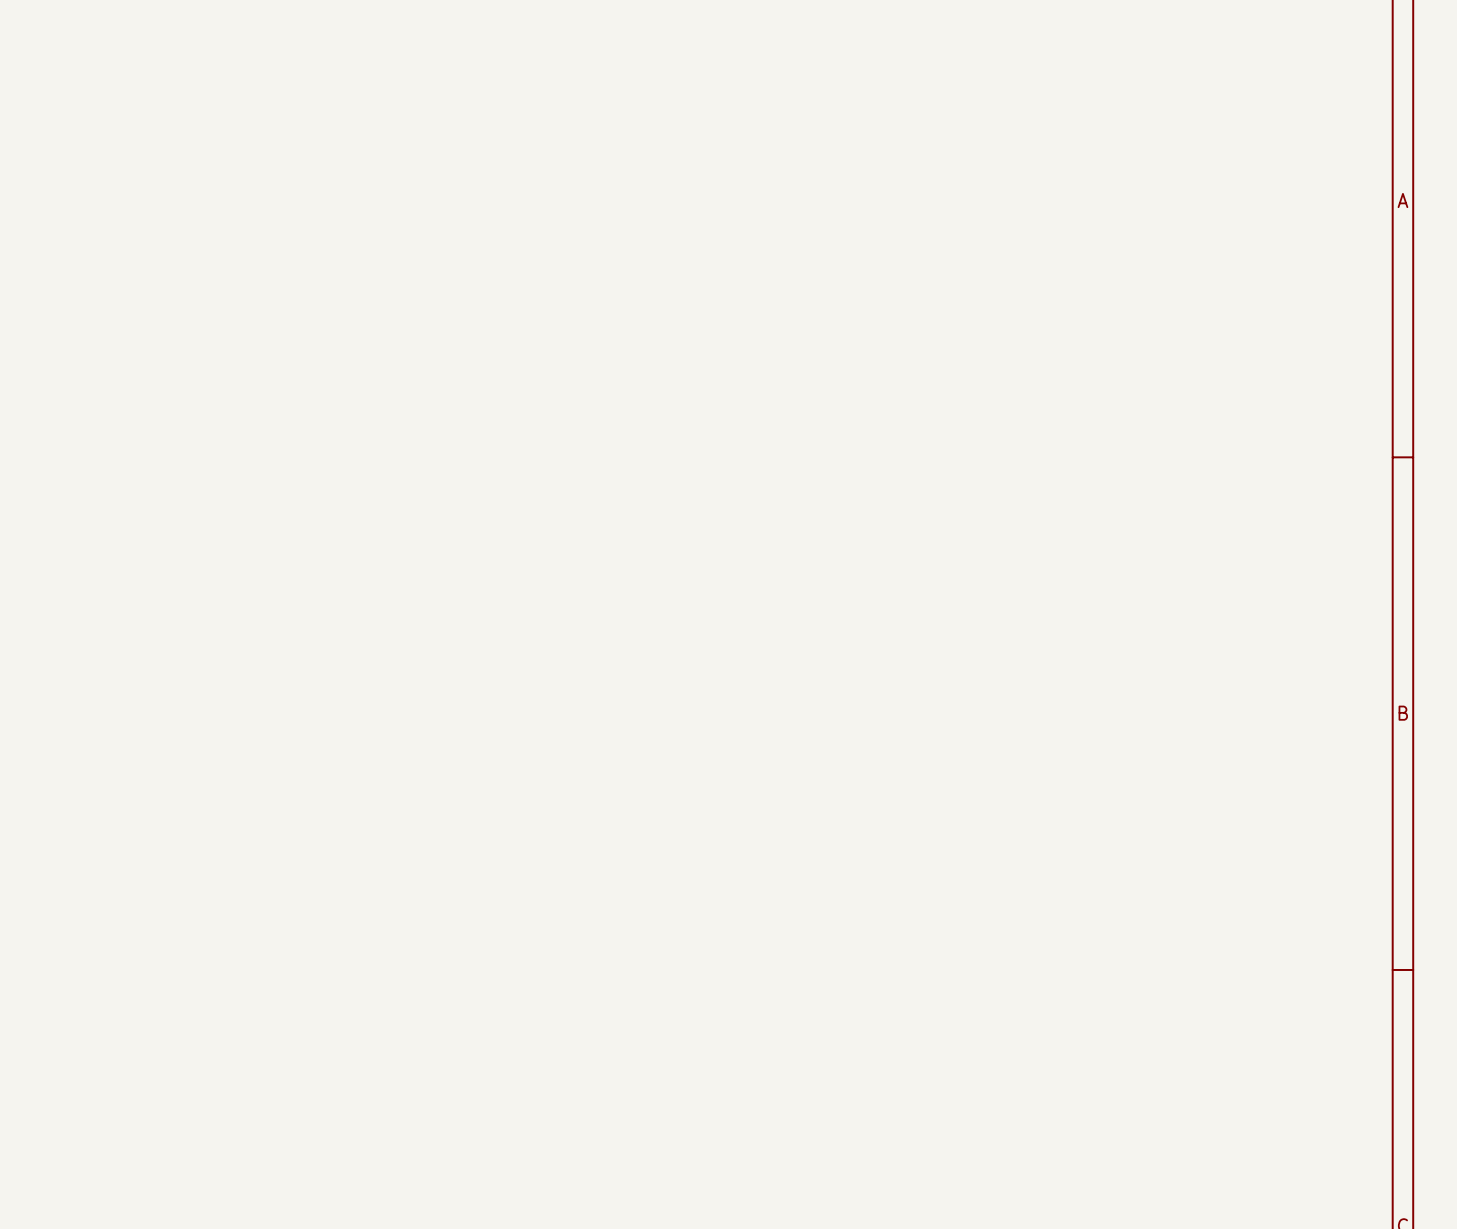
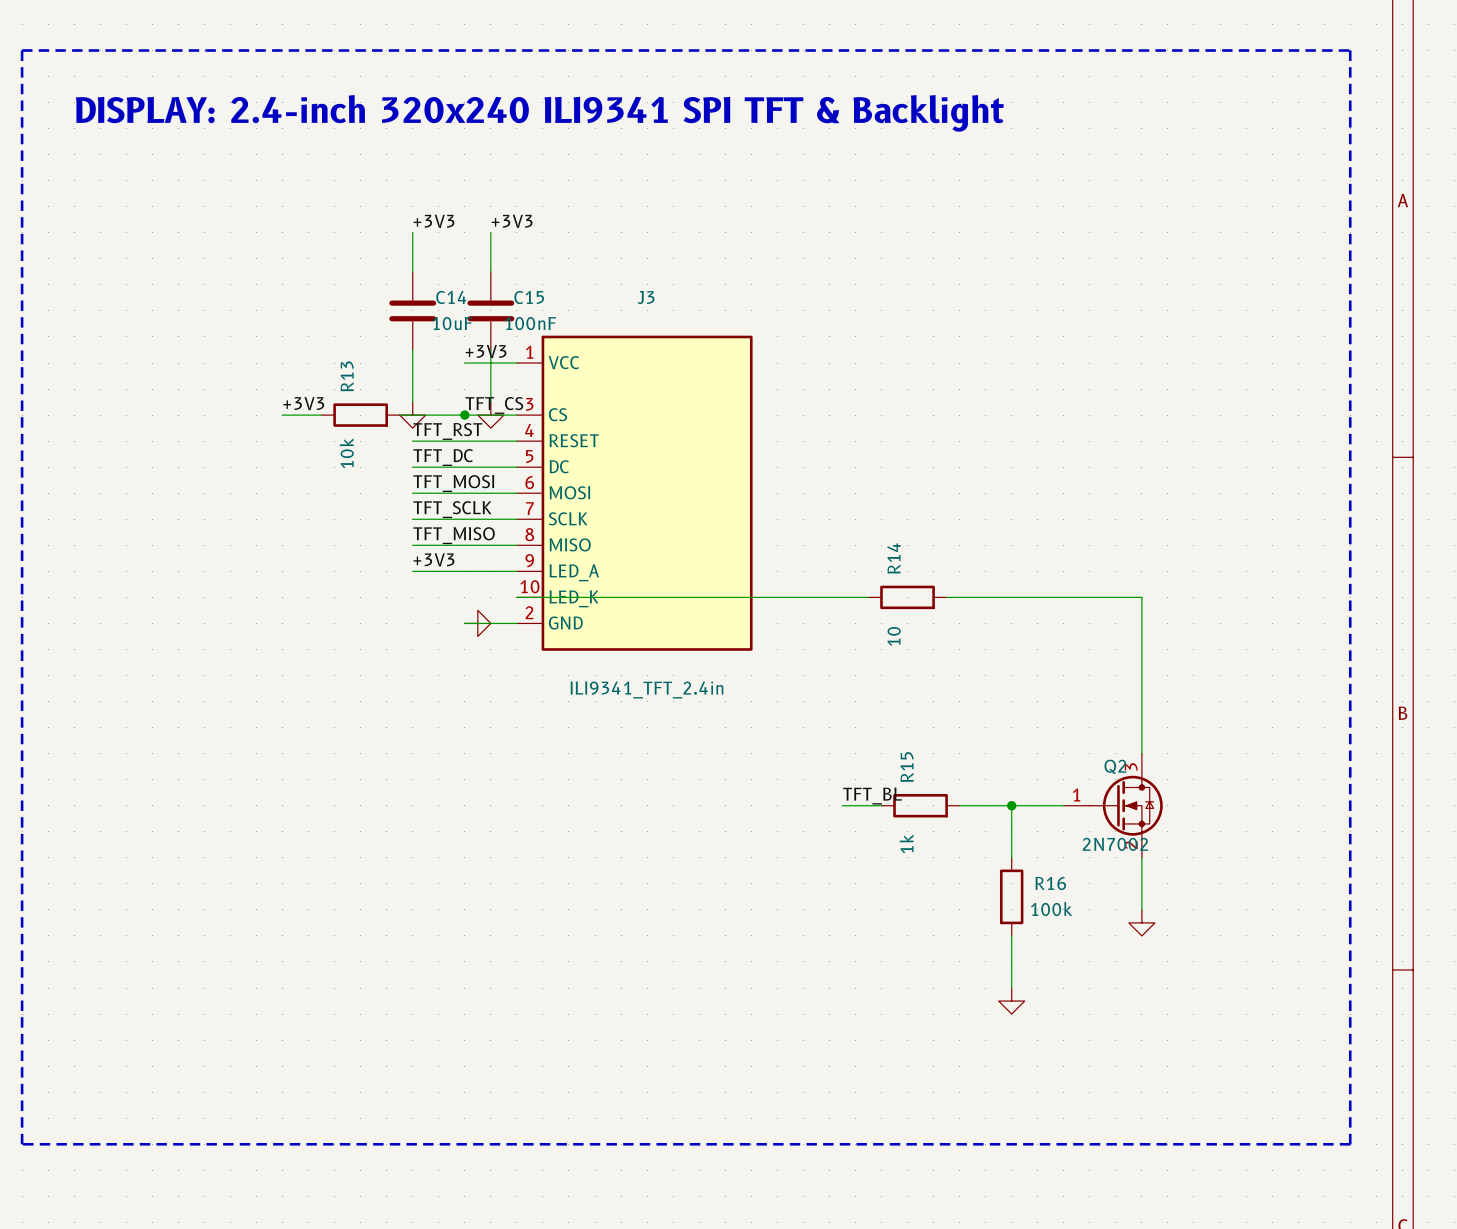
line: none -> (22, 50) (1350, 50) (1350, 1144) (22, 1144) (22, 50)
text: none -> DISPLAY: 2.4-inch 320x240 ILI9341 SPI TFT & Backlight (539, 113)
label: none -> +3V3 (433, 221)
label: none -> +3V3 (512, 221)
wire: none -> (412, 232) (412, 271)
wire: none -> (490, 232) (490, 271)
C14: none -> 10uF (412, 310)
C15: none -> 100nF (490, 310)
wire: none -> (412, 349) (412, 402)
wire: none -> (490, 349) (490, 402)
label: none -> +3V3 (486, 351)
wire: none -> (464, 363) (516, 363)
label: none -> +3V3 (303, 403)
label: none -> TFT_CS (494, 405)
wire: none -> (282, 415) (321, 415)
R13: none -> 10k (360, 415)
wire: none -> (399, 415) (516, 415)
power symbol: none -> (412, 415)
junction: none -> (464, 415)
power symbol: none -> (490, 415)
label: none -> TFT_RST (447, 431)
wire: none -> (412, 441) (516, 441)
label: none -> TFT_DC (443, 457)
wire: none -> (412, 467) (516, 467)
label: none -> TFT_MOSI (453, 483)
wire: none -> (412, 493) (516, 493)
J3: none -> ILI9341_TFT_2.4in (634, 493)
label: none -> TFT_SCLK (452, 509)
wire: none -> (412, 519) (516, 519)
label: none -> TFT_MISO (454, 535)
wire: none -> (412, 545) (516, 545)
label: none -> +3V3 (433, 559)
wire: none -> (412, 571) (516, 571)
wire: none -> (516, 597) (868, 597)
R14: none -> 10 (907, 597)
wire: none -> (946, 597) (1141, 597) (1141, 753)
wire: none -> (464, 623) (516, 623)
power symbol: none -> (477, 623)
label: none -> TFT_BL (872, 796)
wire: none -> (842, 805) (881, 805)
R15: none -> 1k (920, 805)
wire: none -> (959, 805) (1063, 805)
wire: none -> (1011, 805) (1011, 857)
junction: none -> (1011, 805)
Q2: none -> 2N7002 (1113, 805)
wire: none -> (1141, 857) (1141, 909)
R16: none -> 100k (1011, 896)
power symbol: none -> (1141, 922)
wire: none -> (1011, 935) (1011, 988)
power symbol: none -> (1011, 1001)

